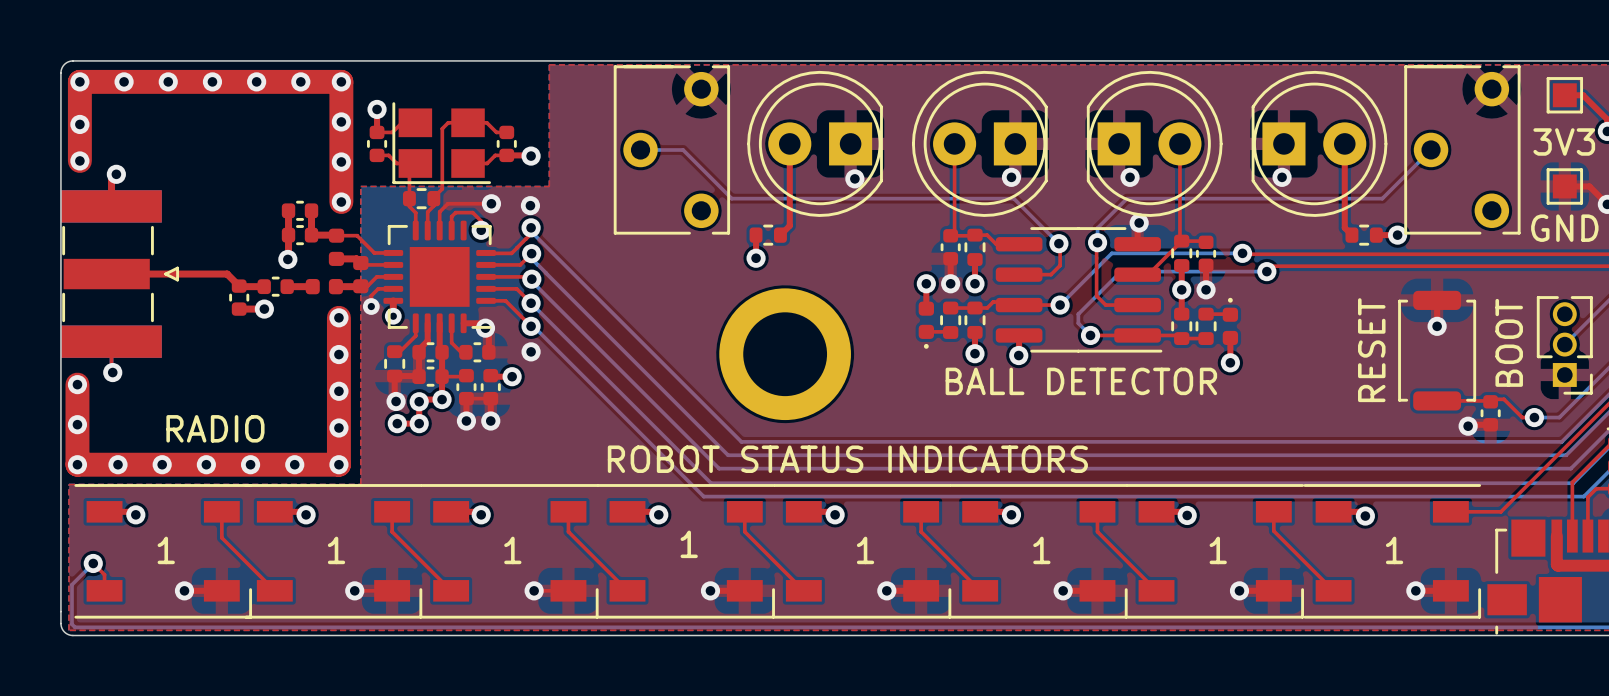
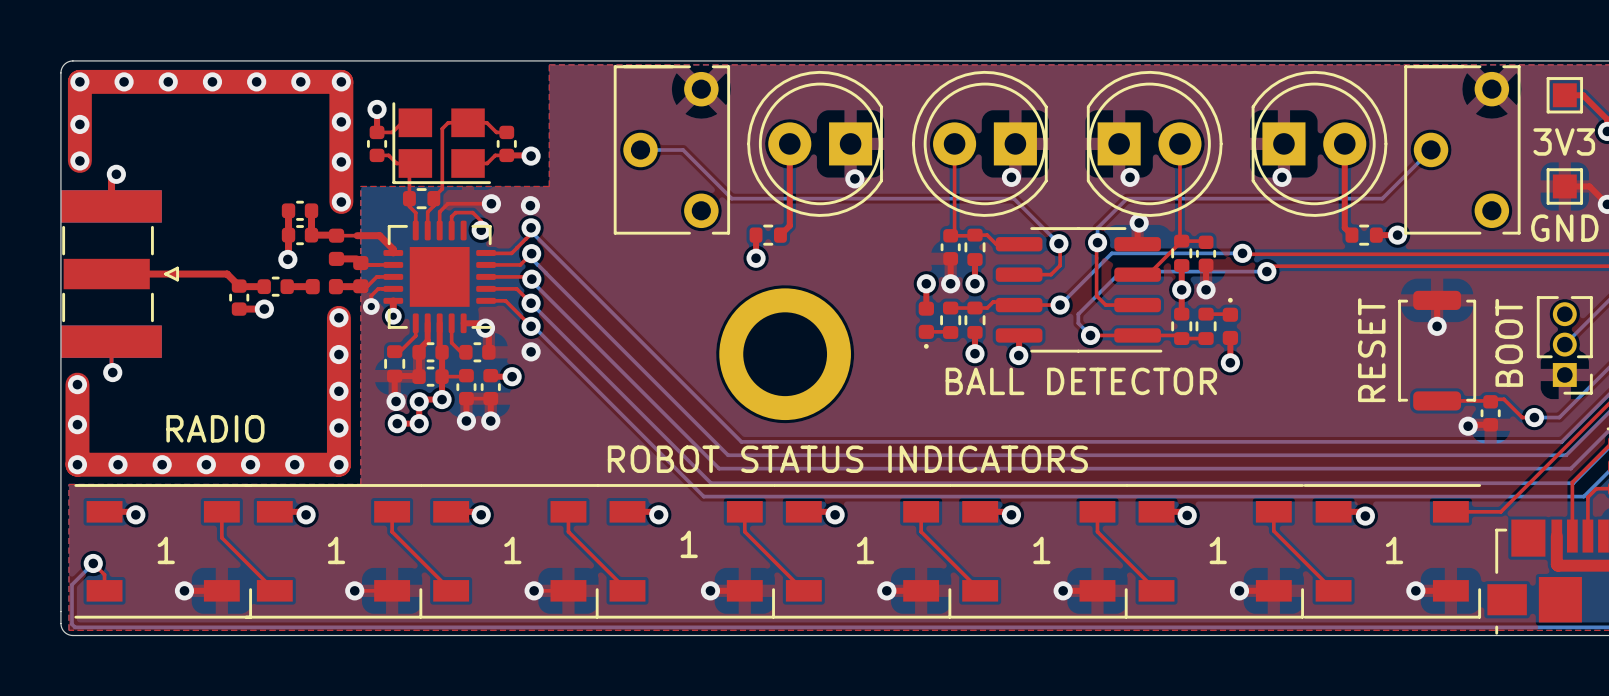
top track: (357, 235) (374, 252) (393, 252) -> (357, 235) (379, 235) (393, 249) (393, 252)

